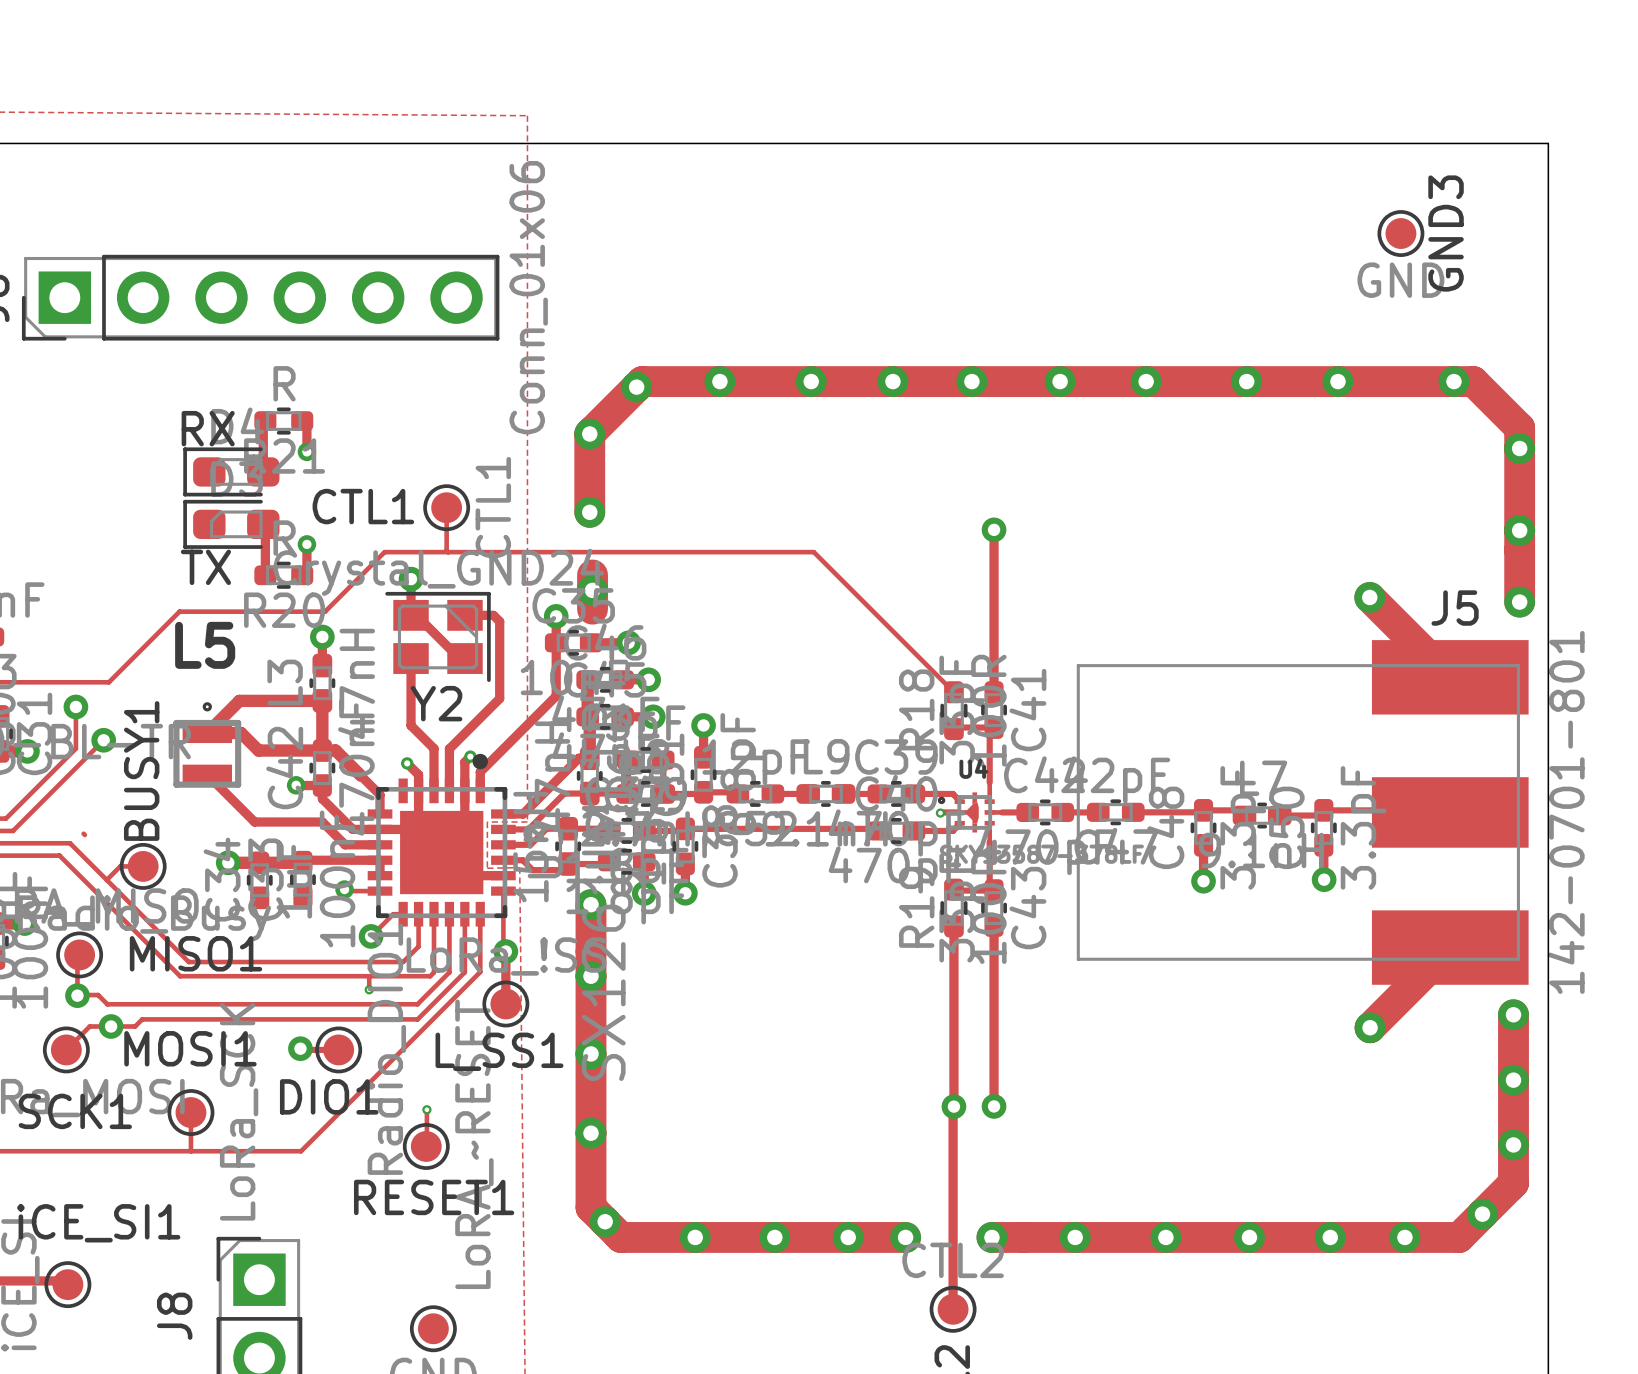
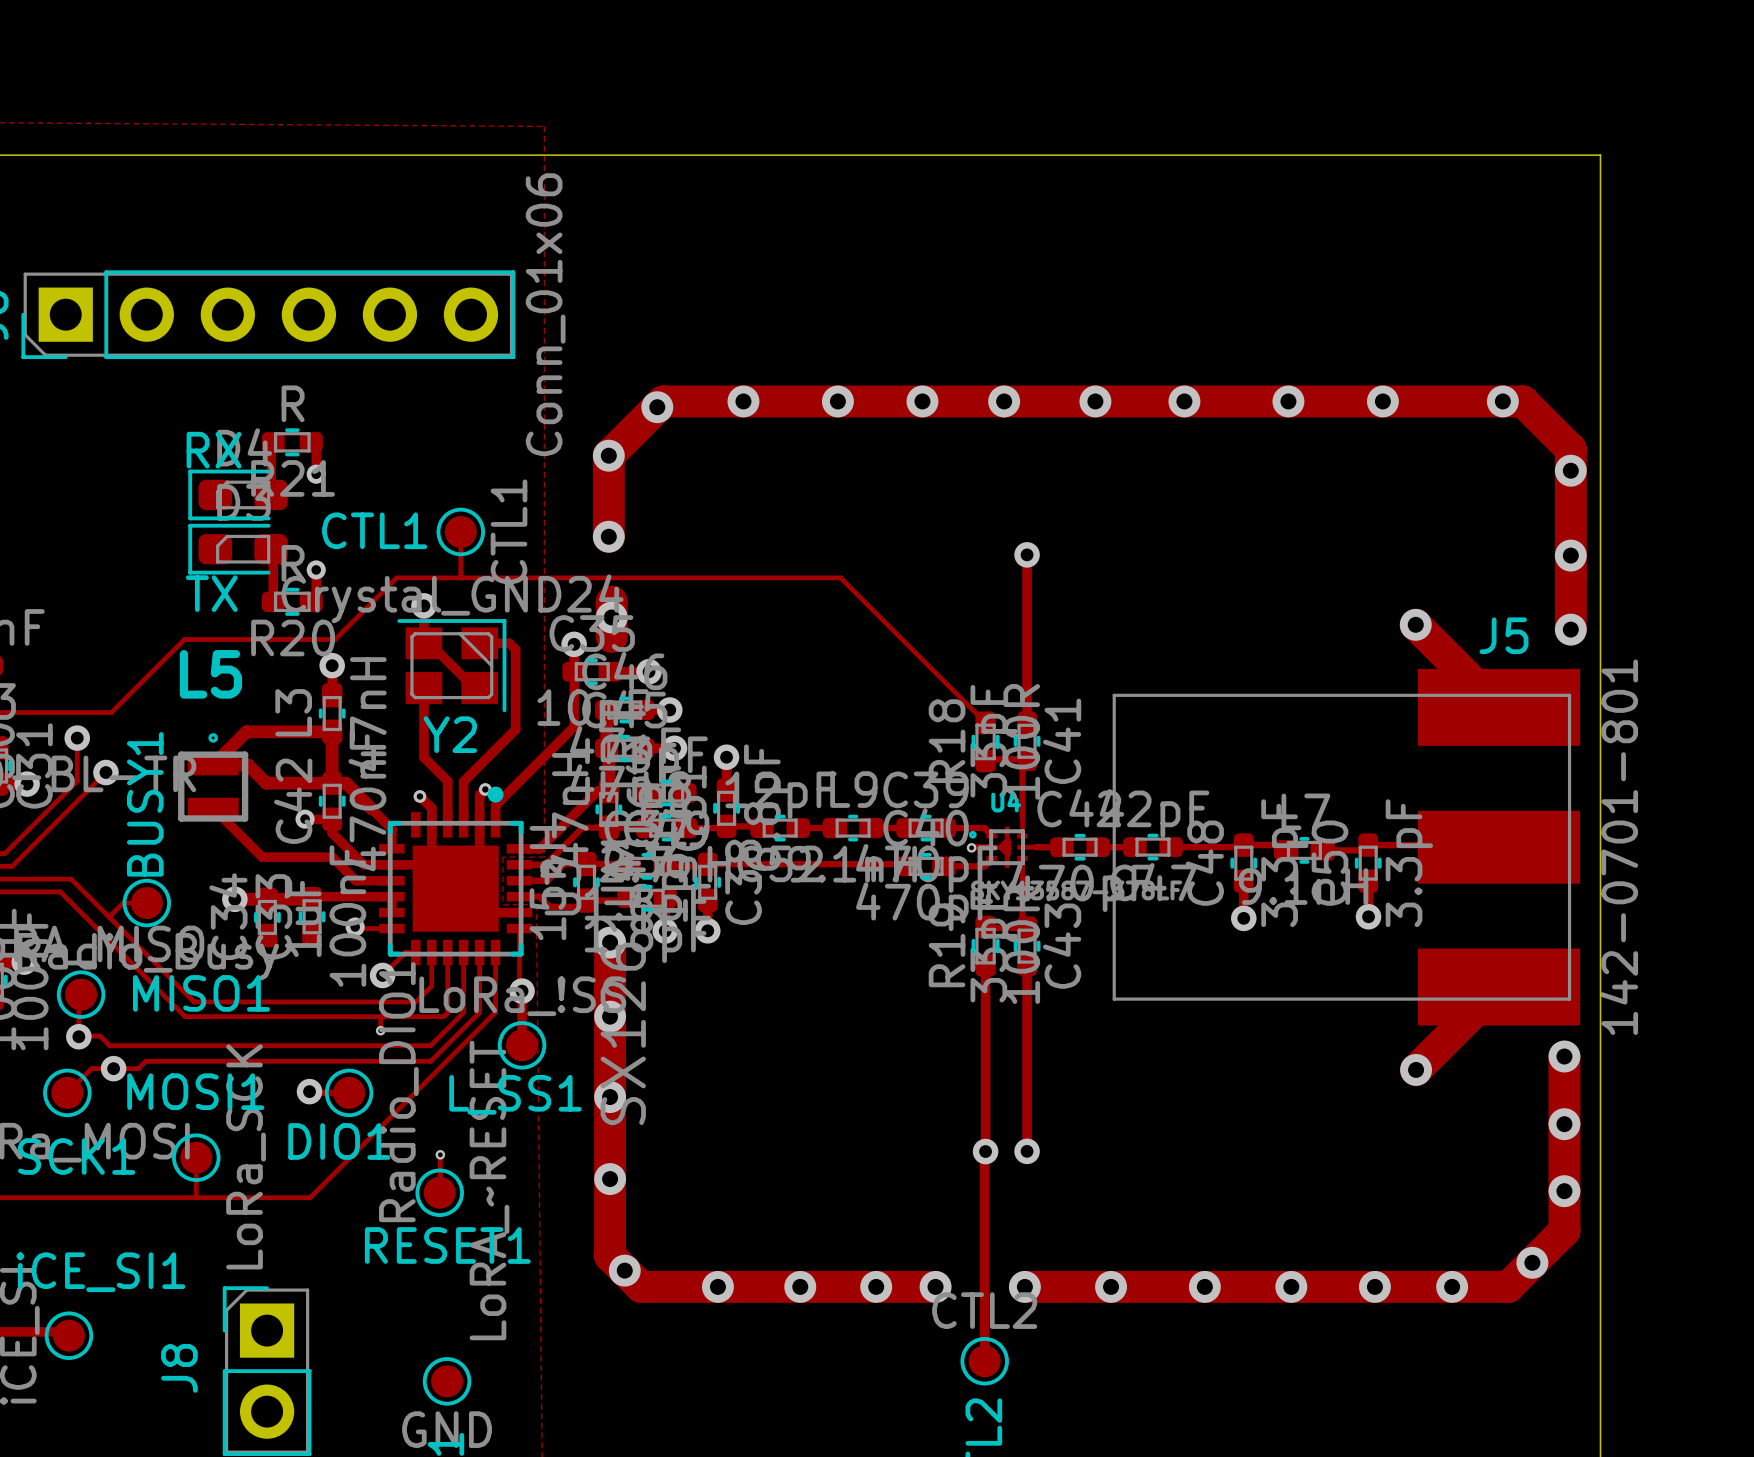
GND3: GND (1400, 233) -> none
track: (83, 833) (84, 834) -> none

